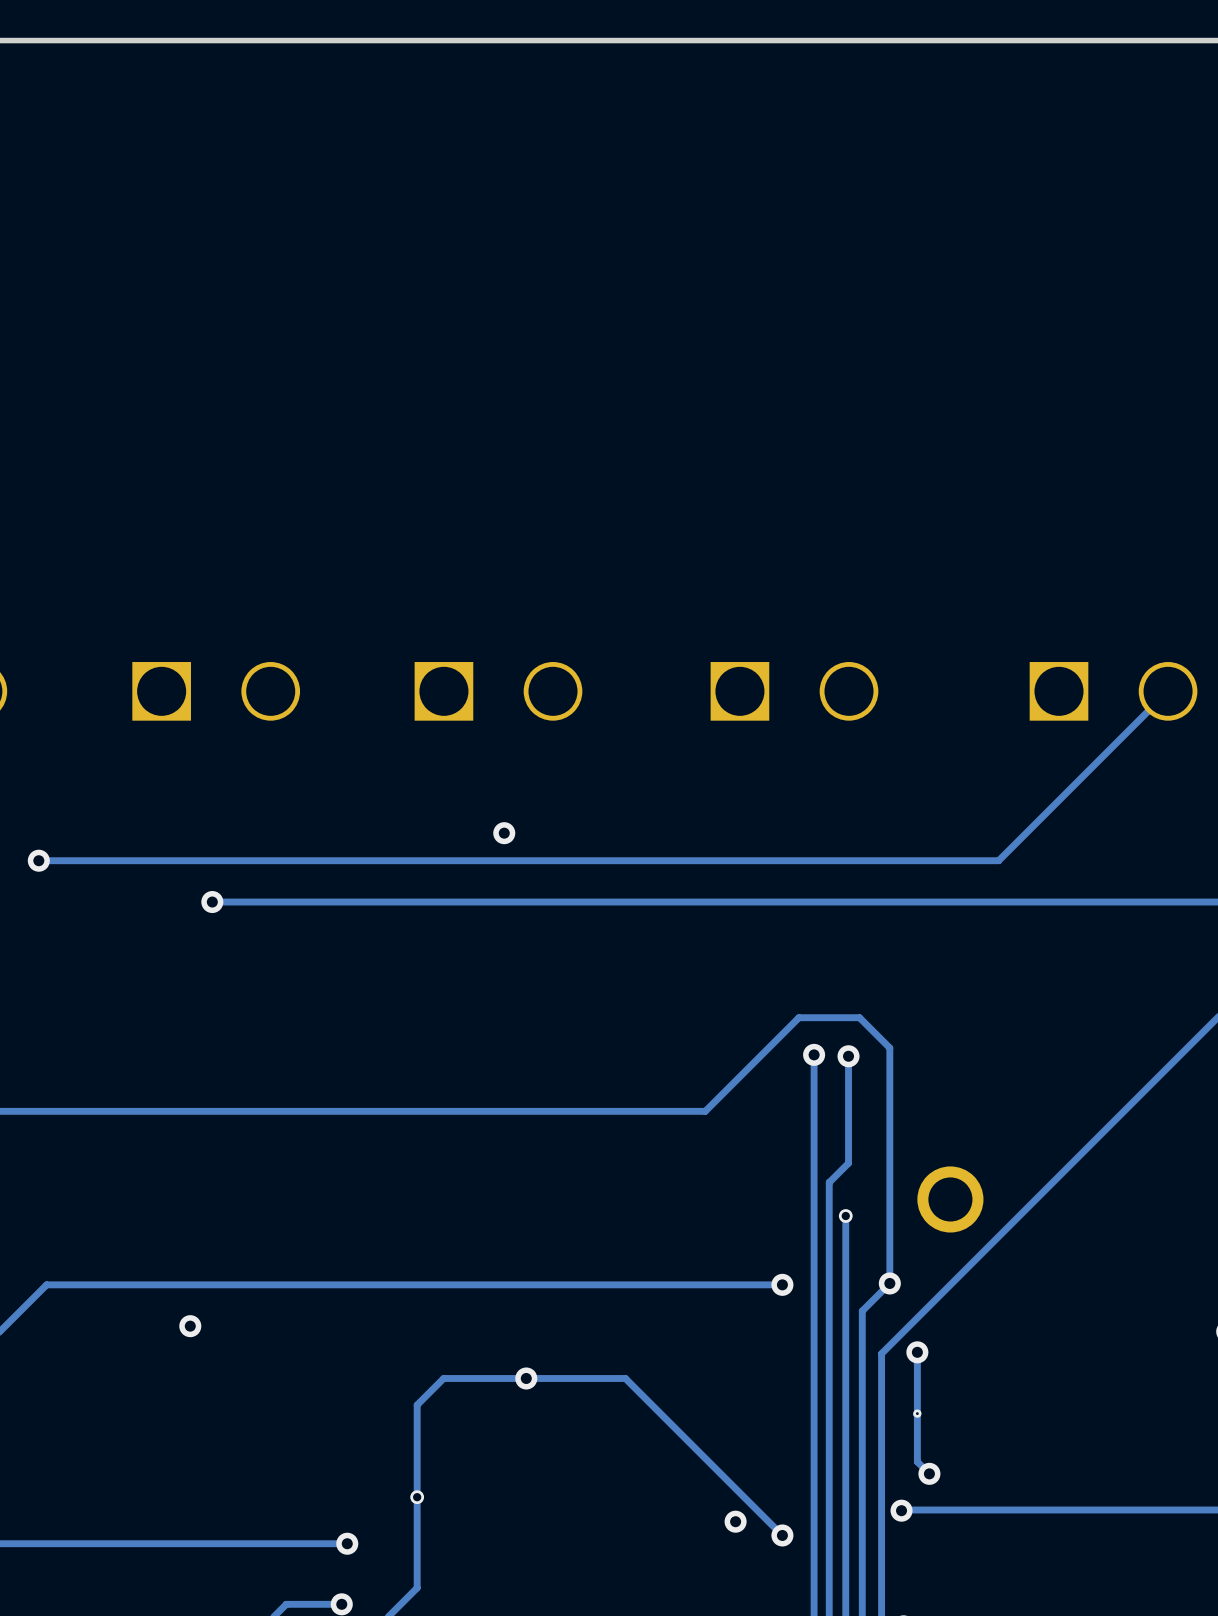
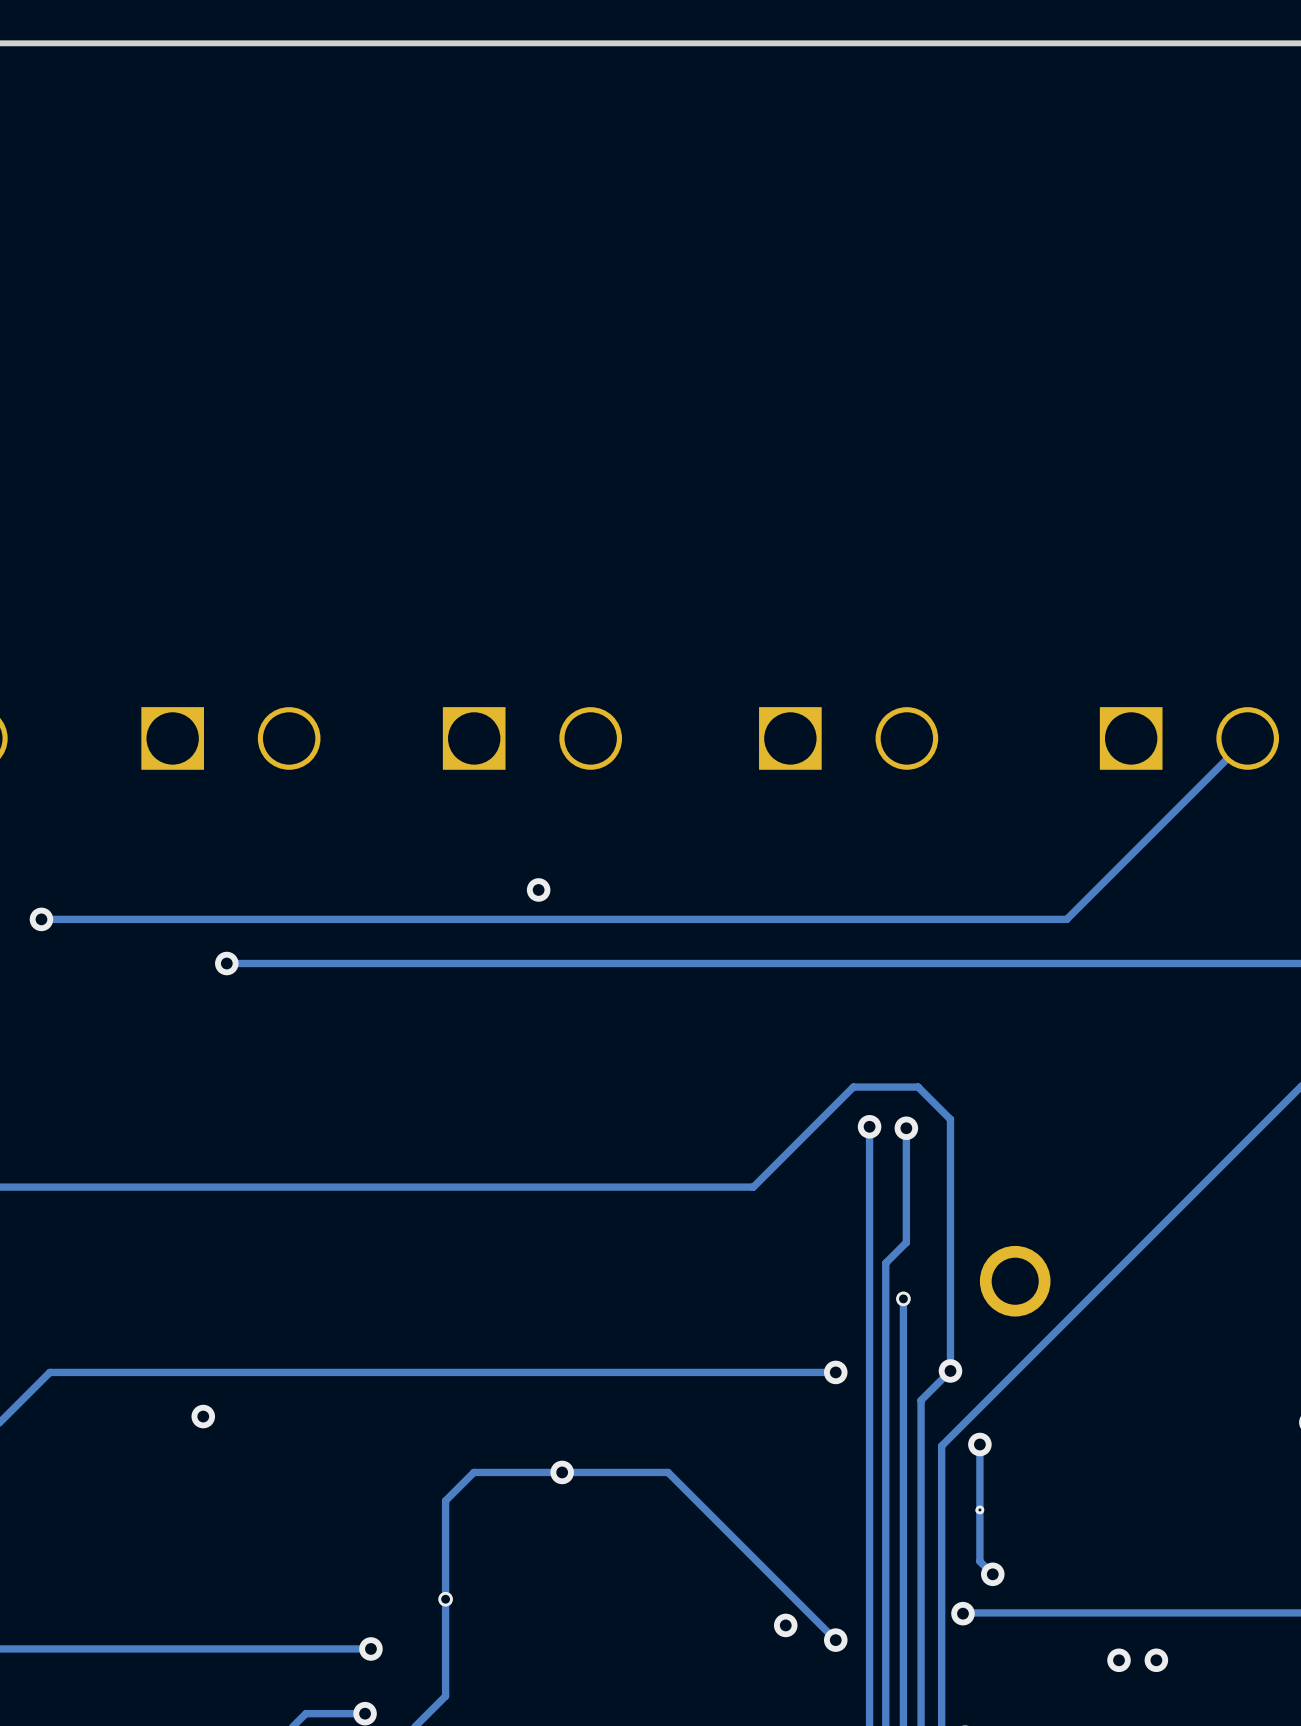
via: none -> (1119, 1660)
via: none -> (1156, 1660)

